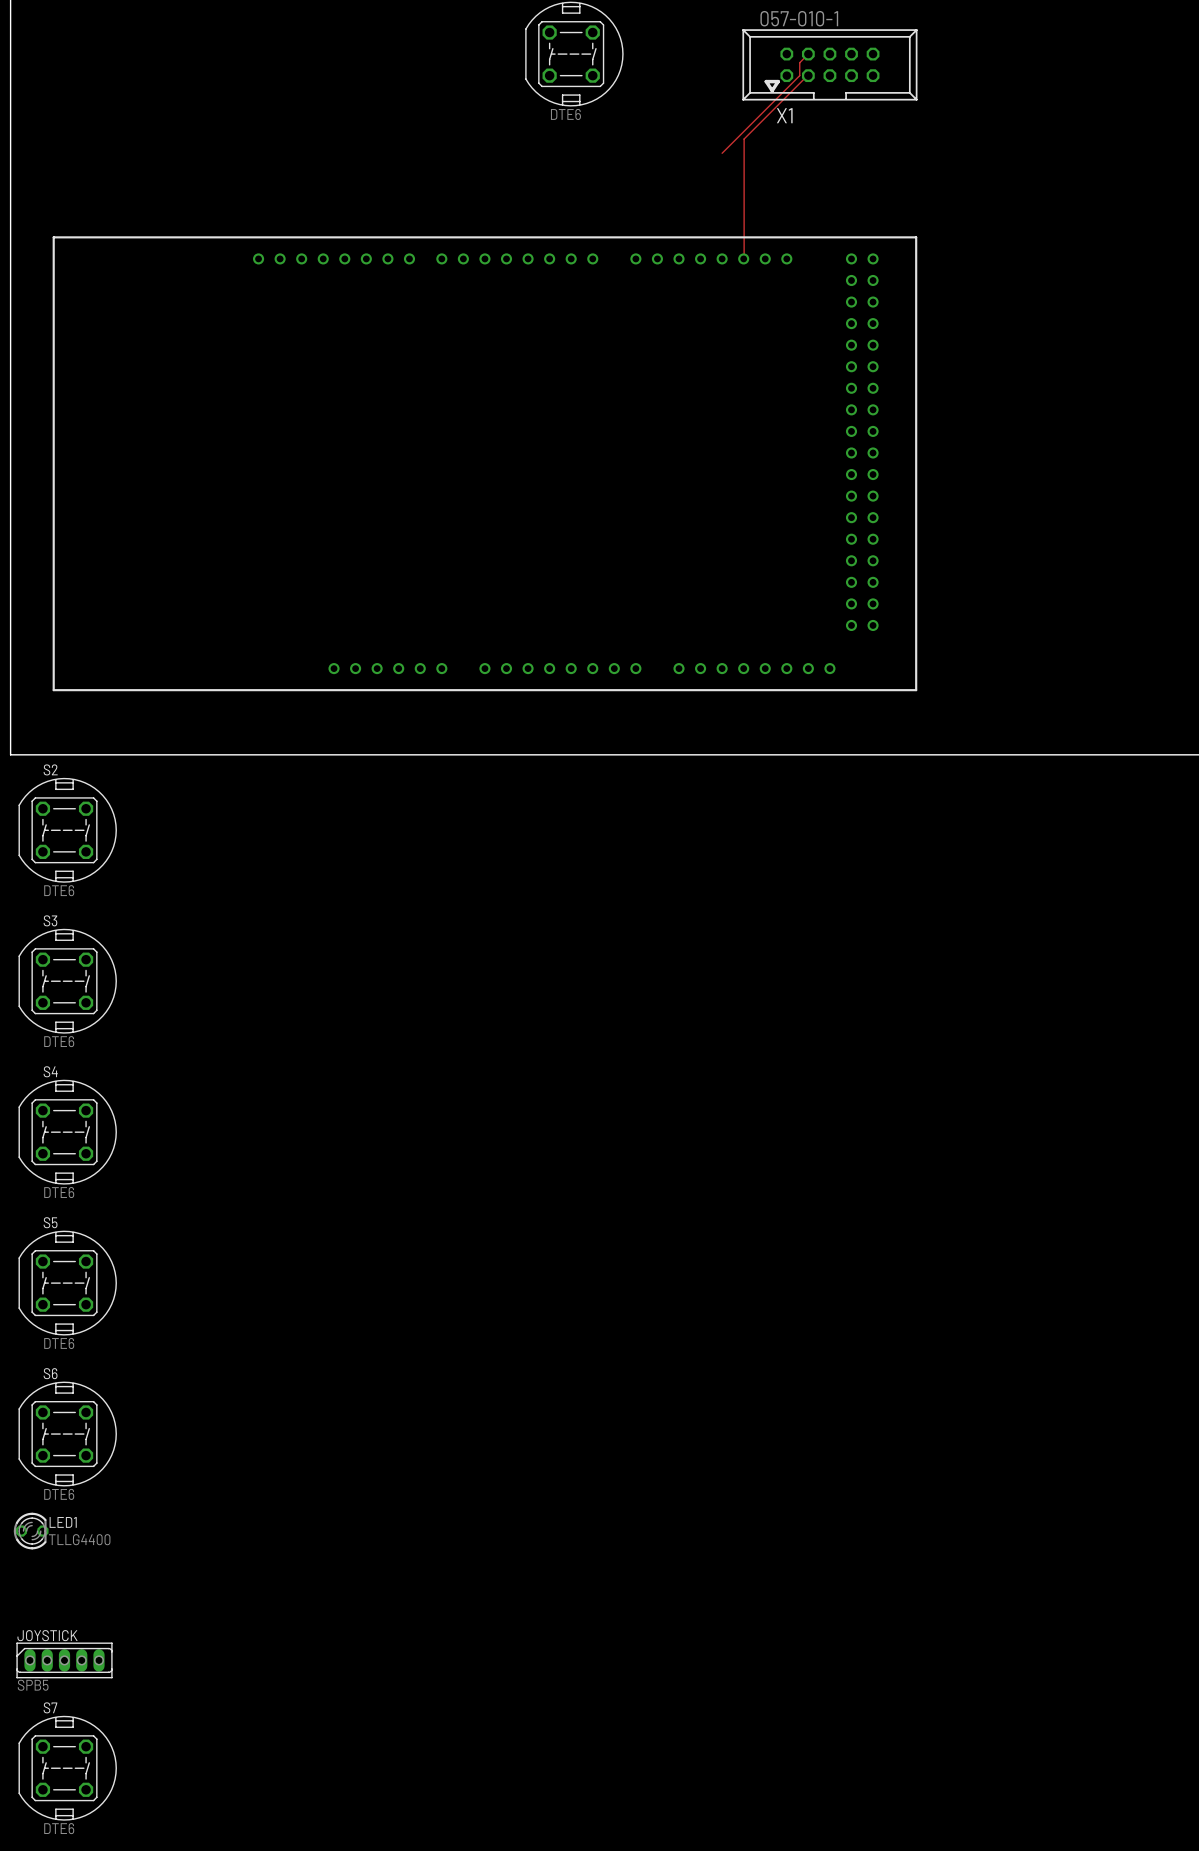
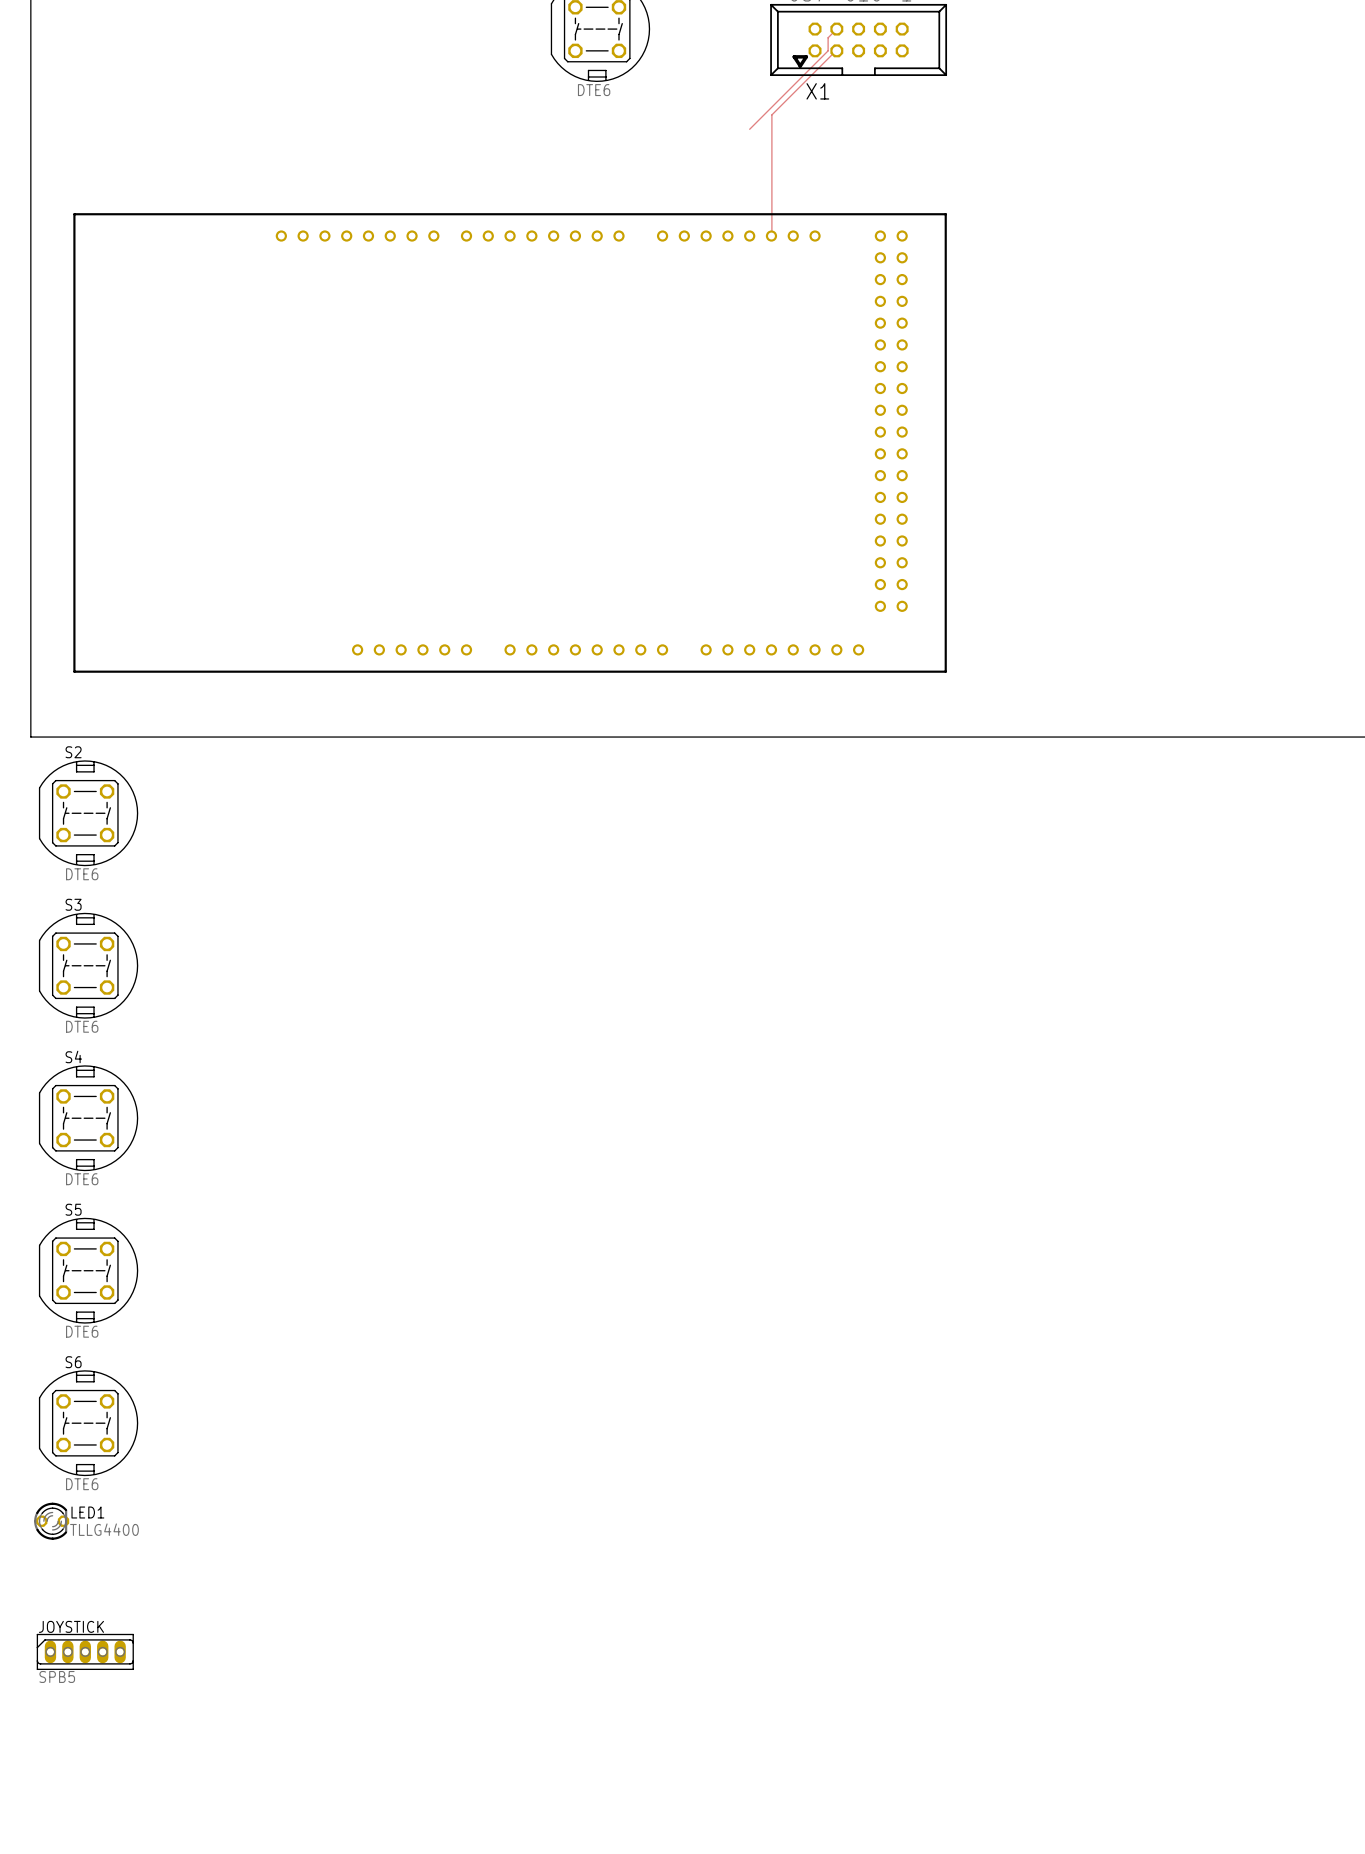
S7: DTE6 (67, 1768) -> none

